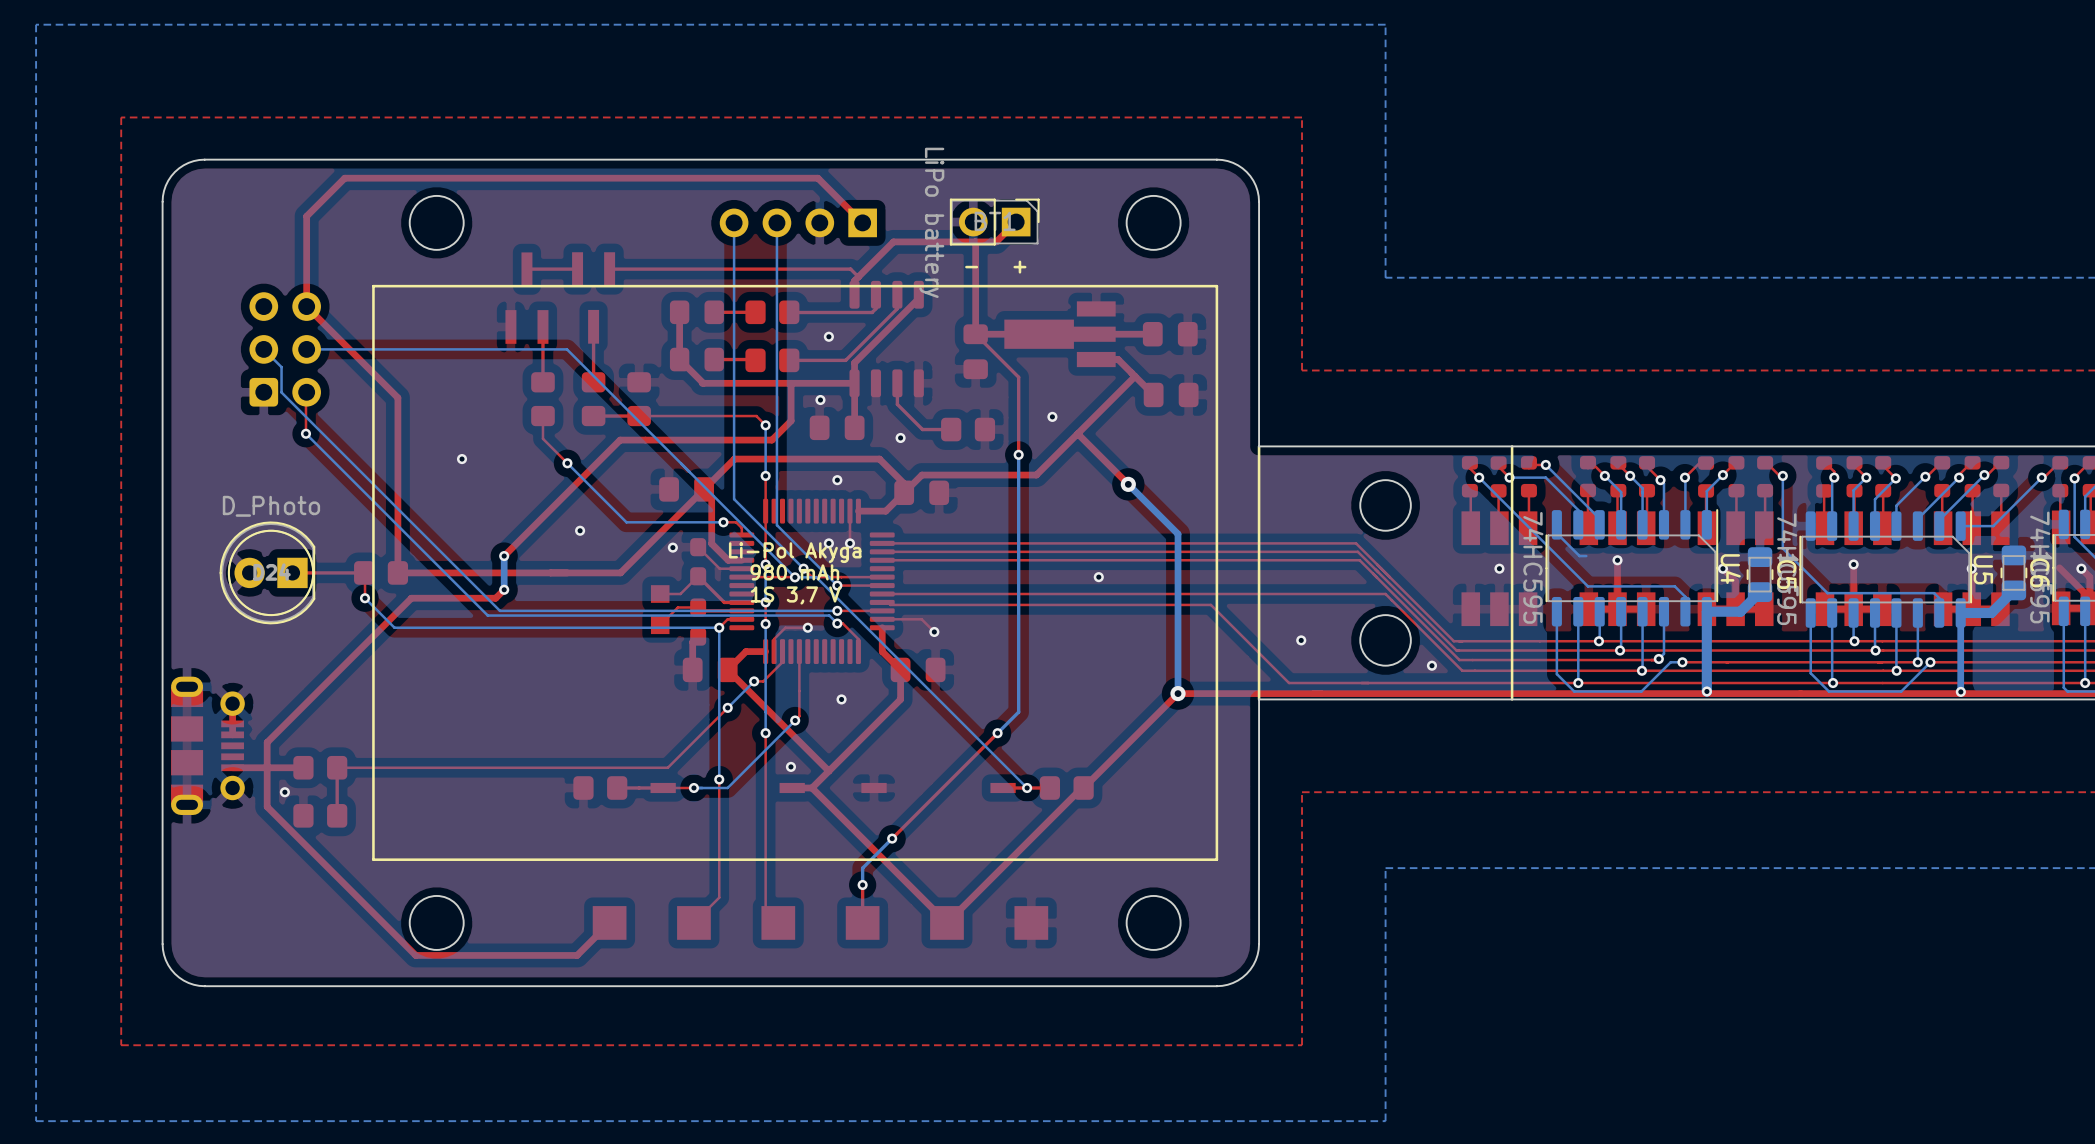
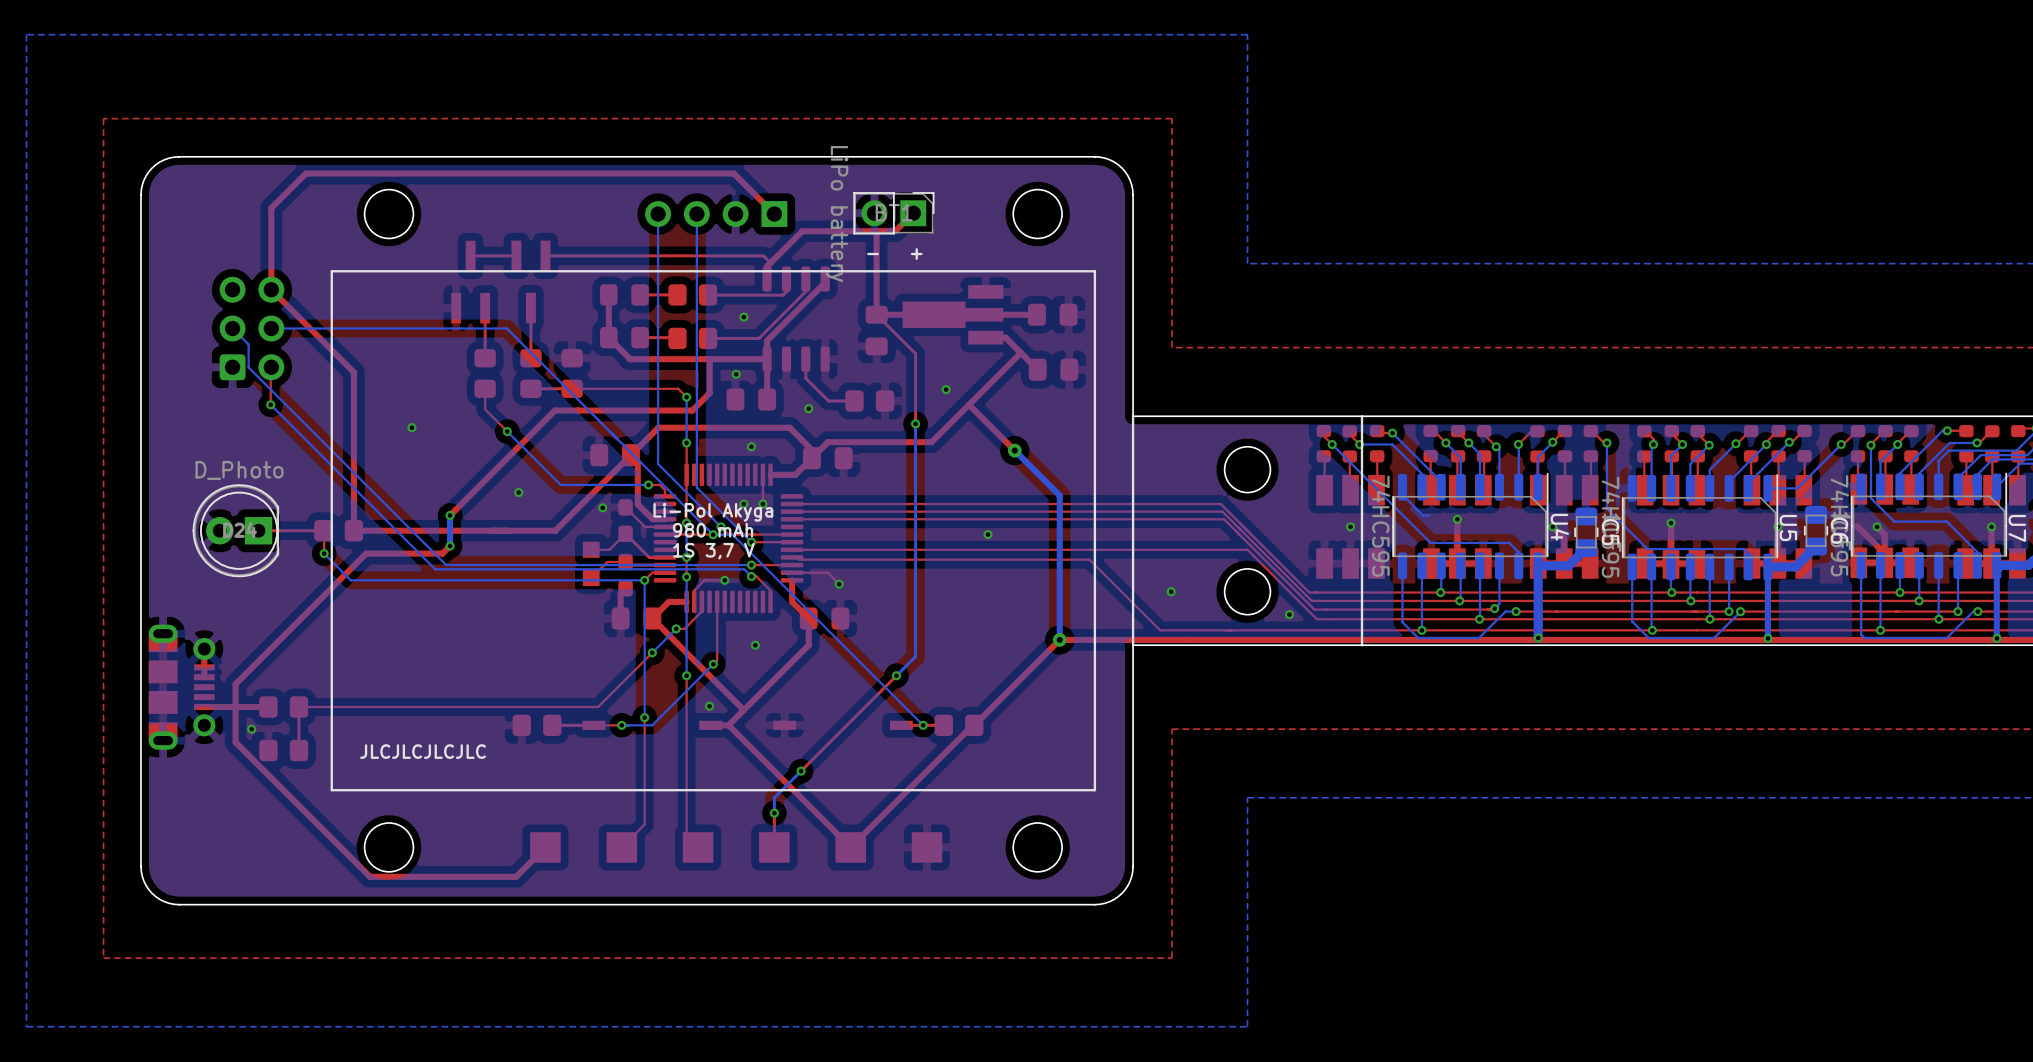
text: none -> JLCJLCJLCJLC (423, 751)

